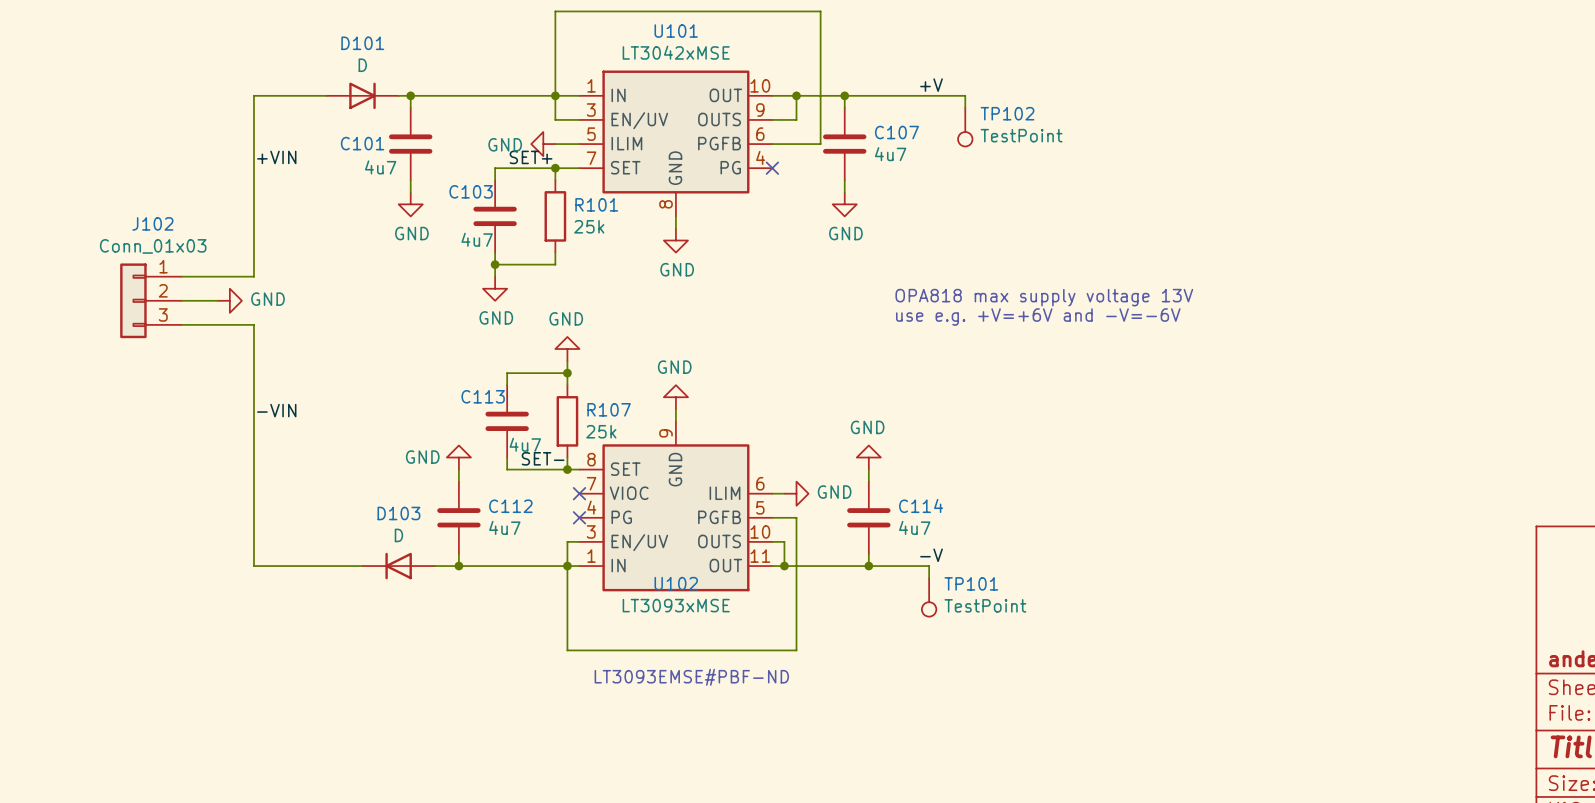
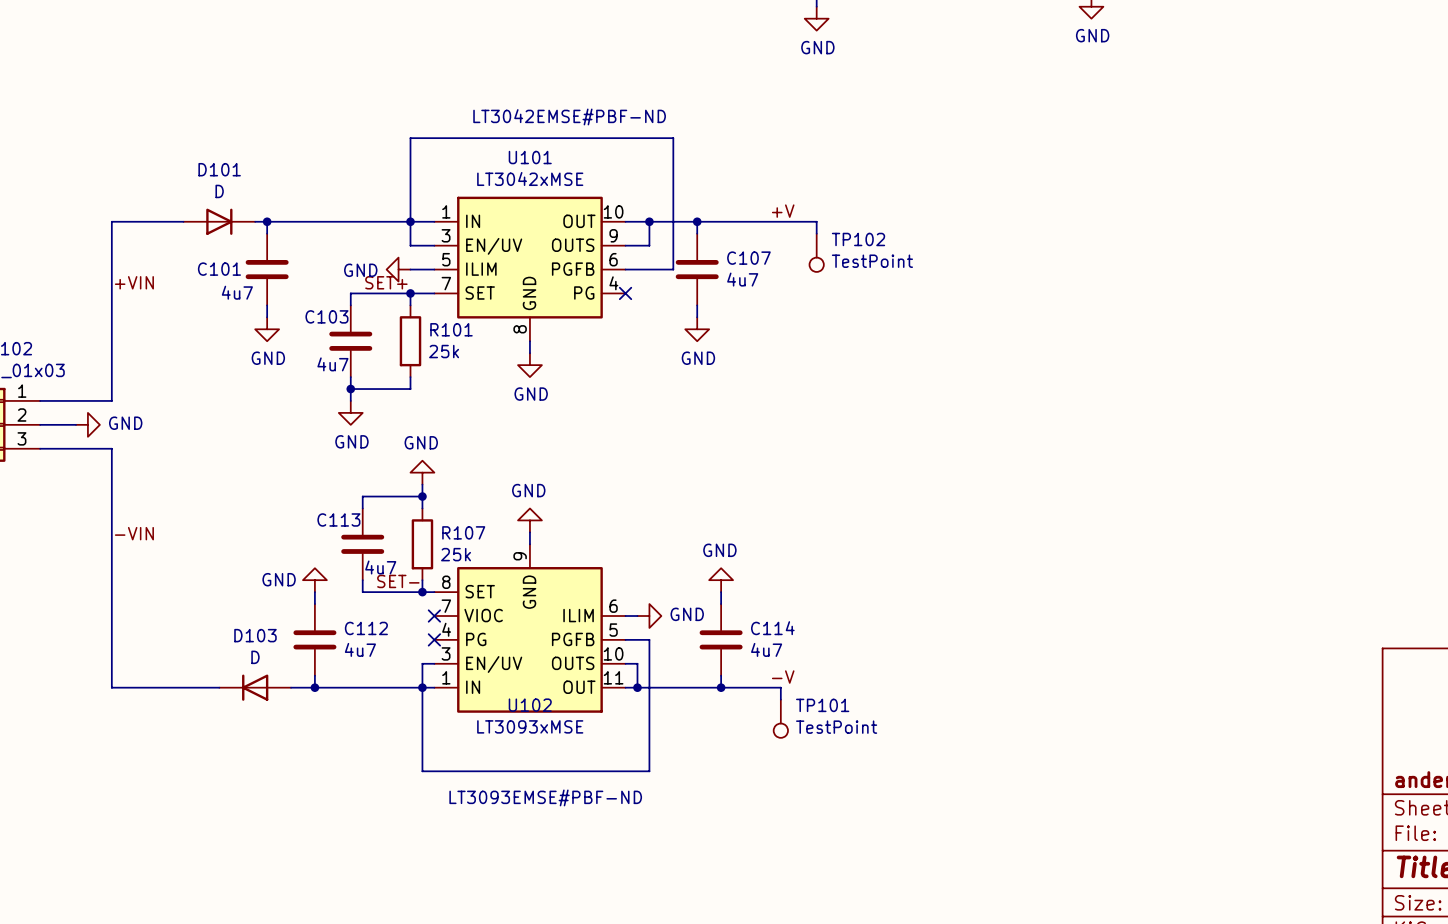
text: OPA818 max supply voltage 13V (1044, 297) -> none
text: use e.g. +V=+6V and -V=-6V (1038, 317) -> none

